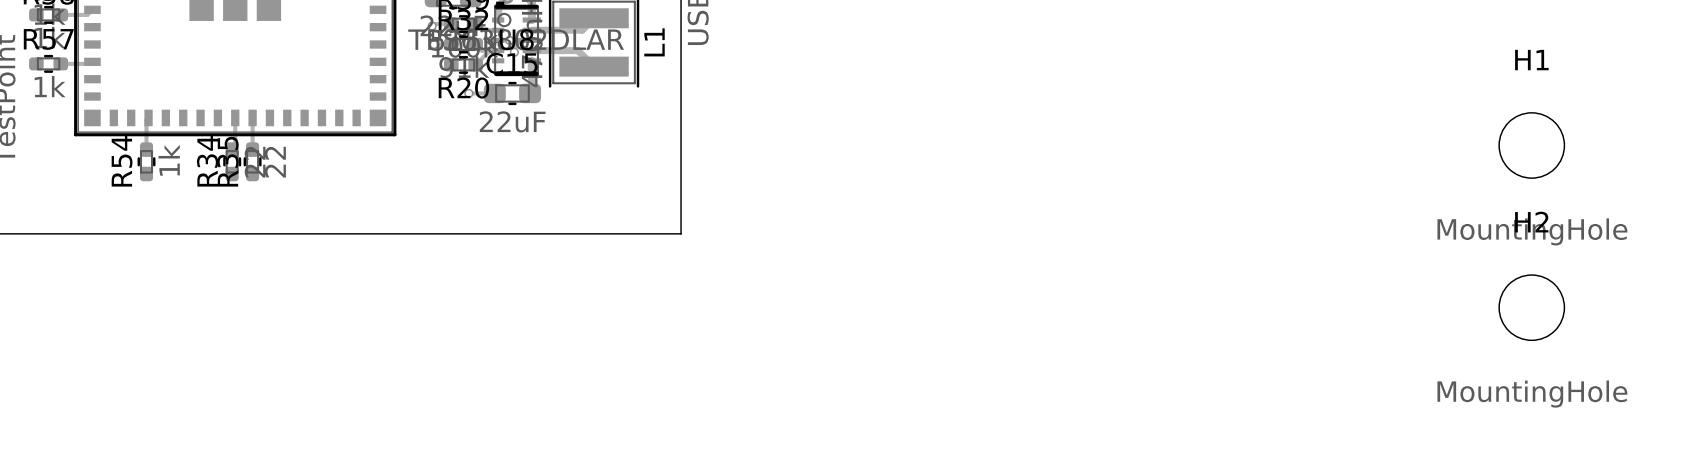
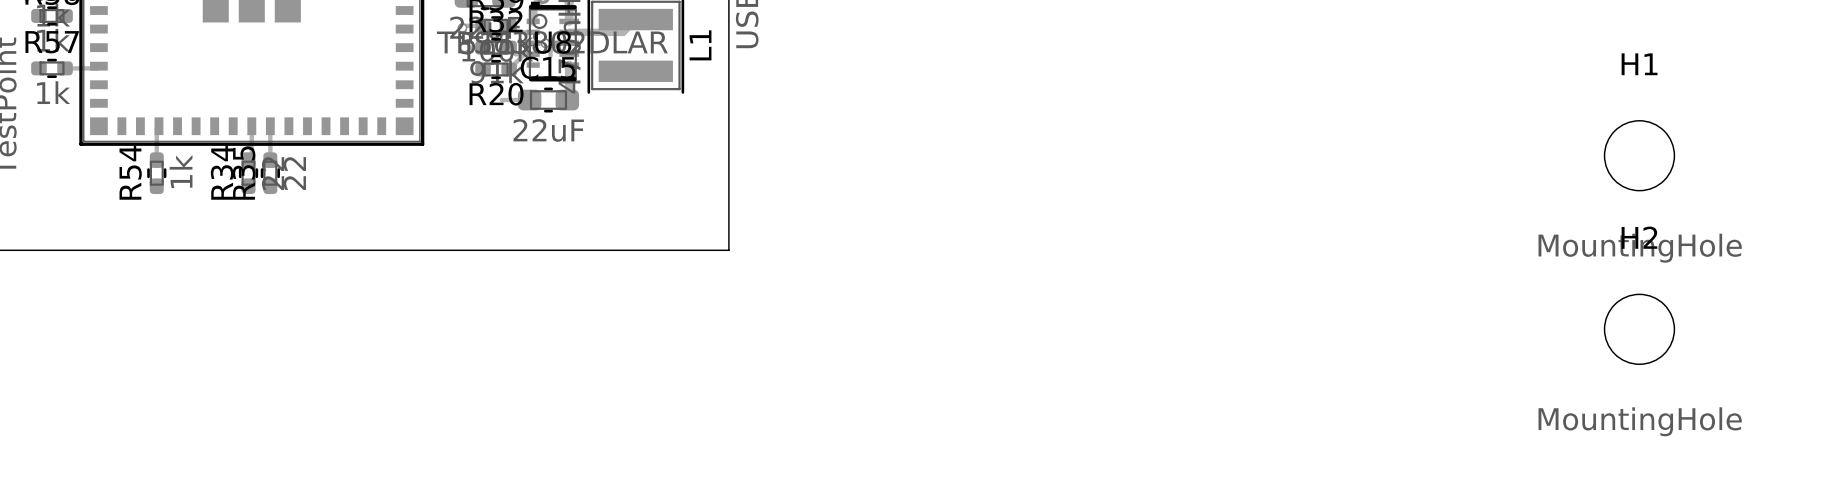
track: (92, 9) (87, 14) (60, 14) -> none
track: (531, 50) (578, 50) (594, 66) -> none
via: (514, 52) -> none
via: (468, 93) -> none

